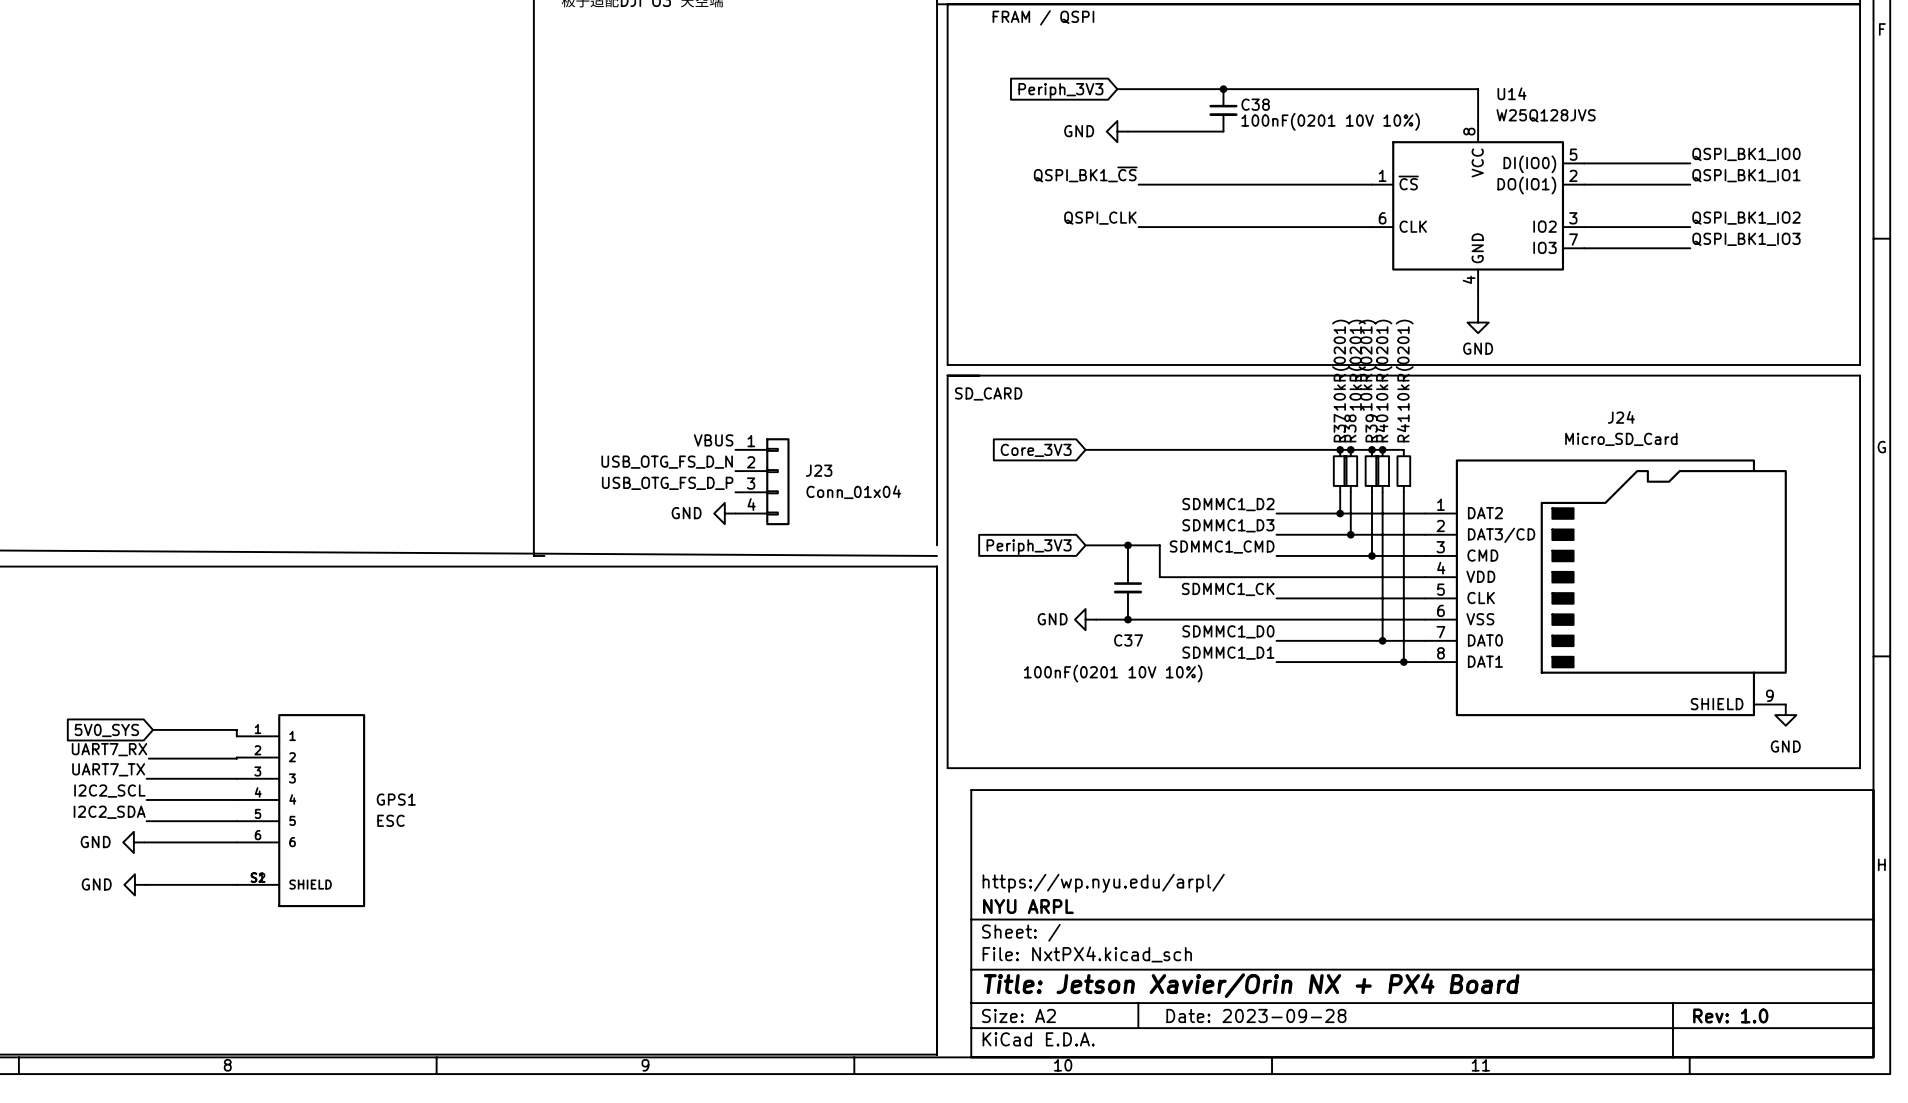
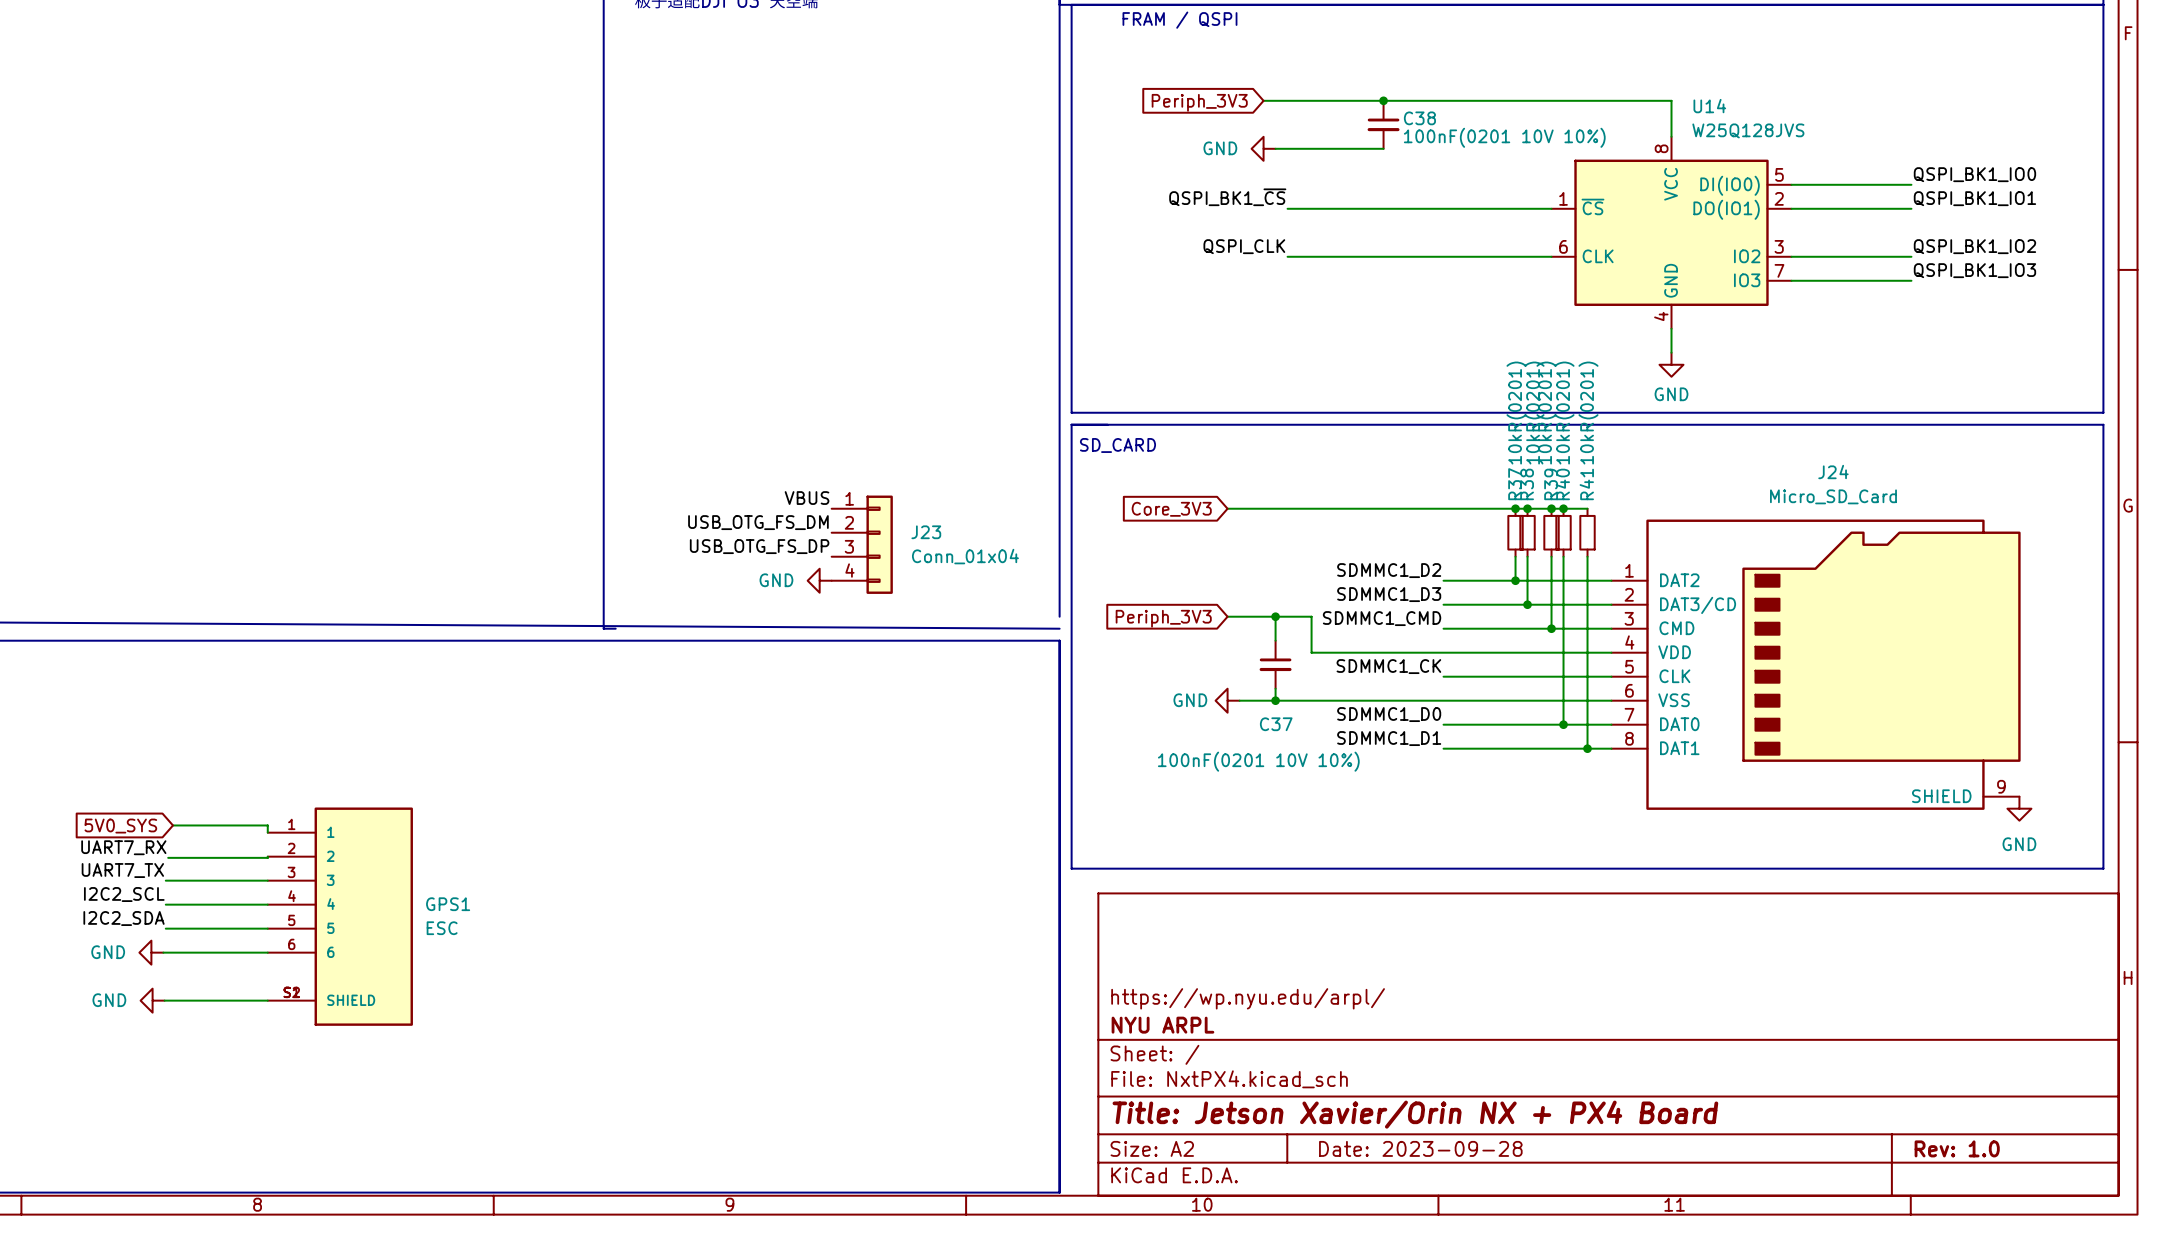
label: USB_OTG_FS_D_N (667, 462) -> USB_OTG_FS_DM (758, 522)
label: USB_OTG_FS_D_P (667, 483) -> USB_OTG_FS_DP (759, 546)

